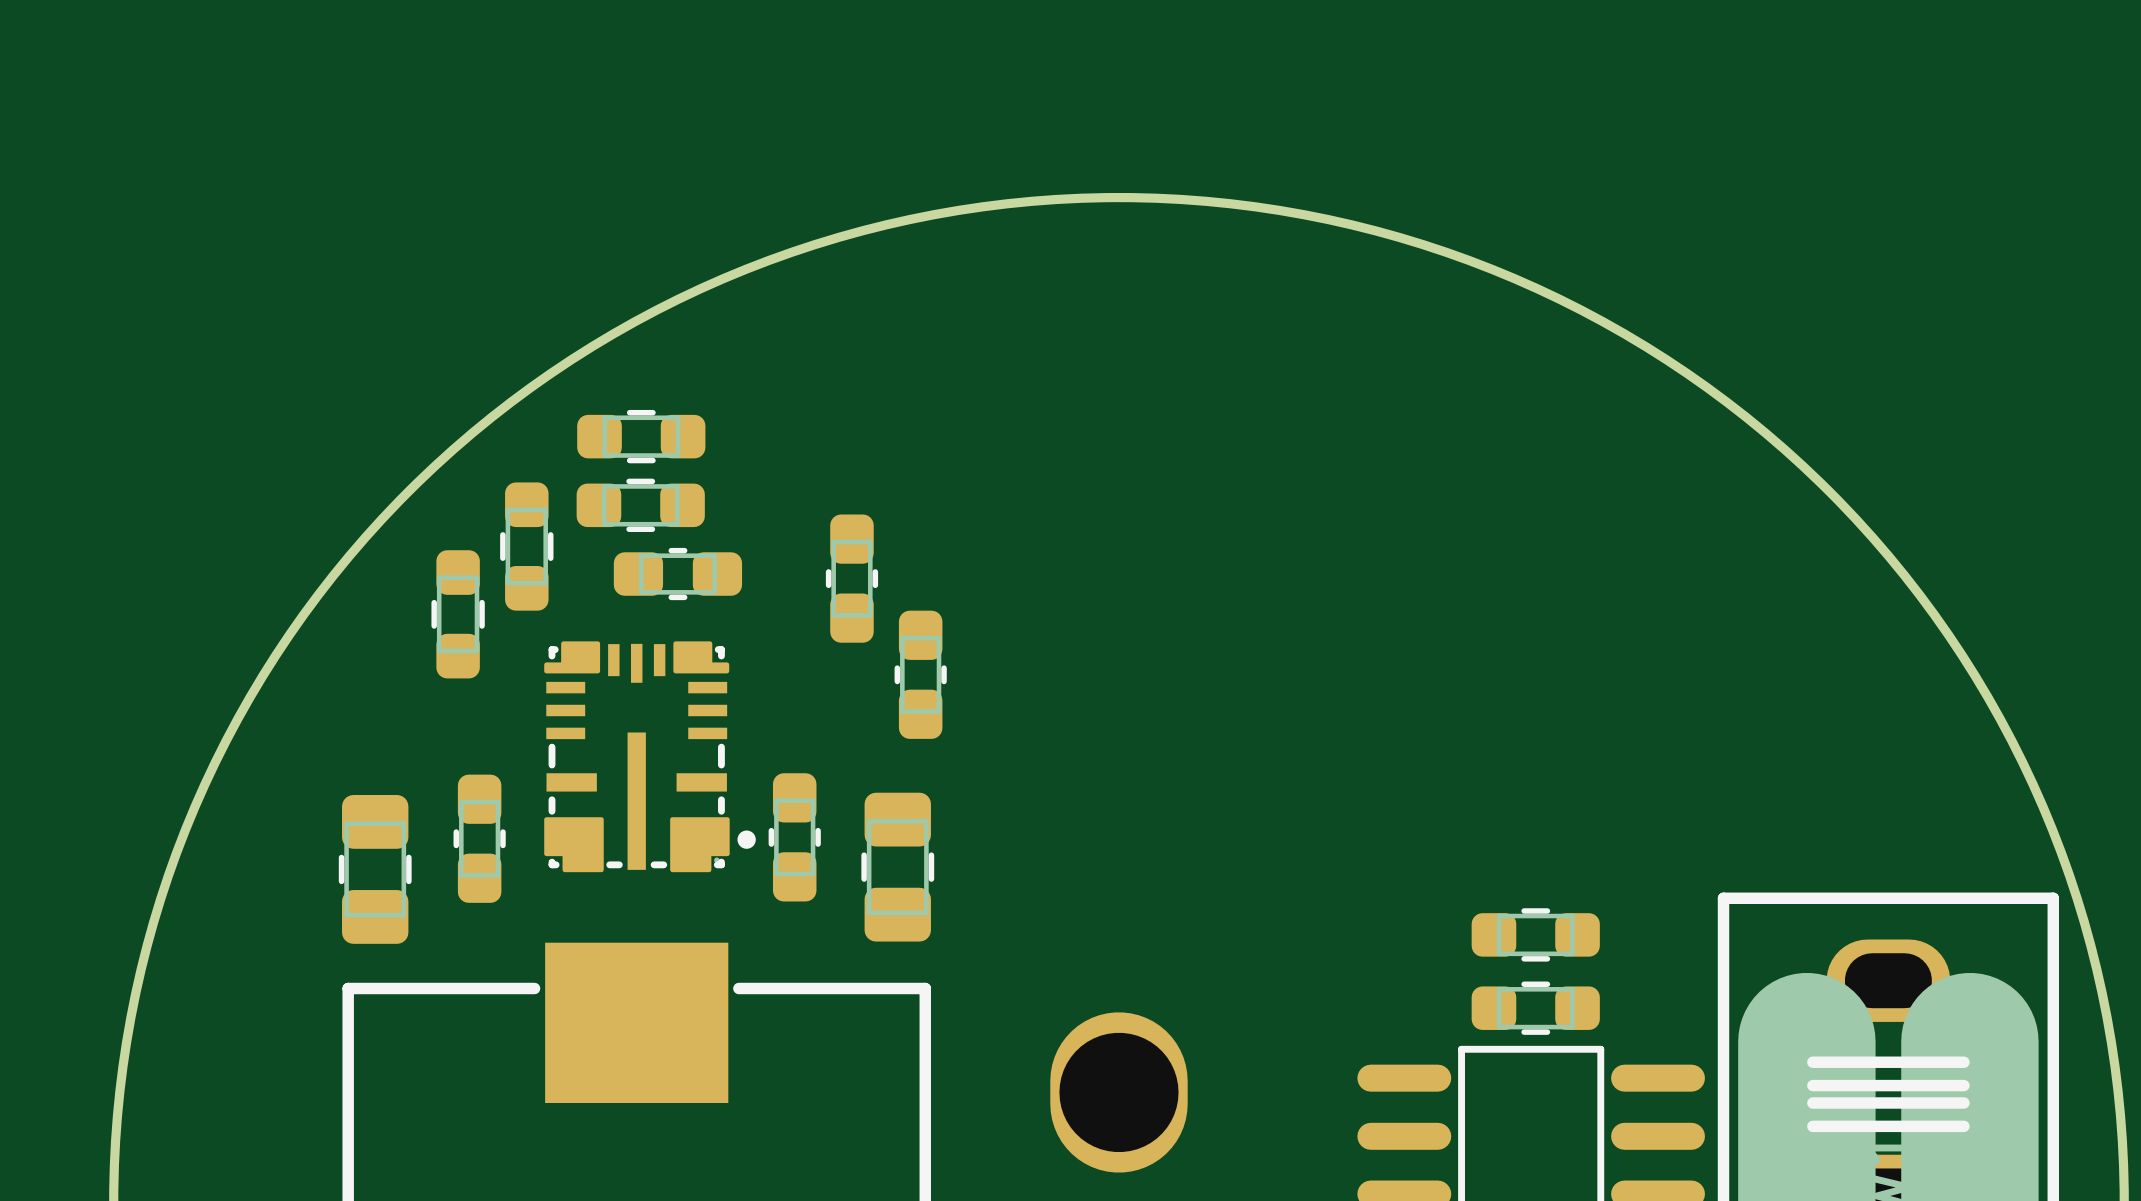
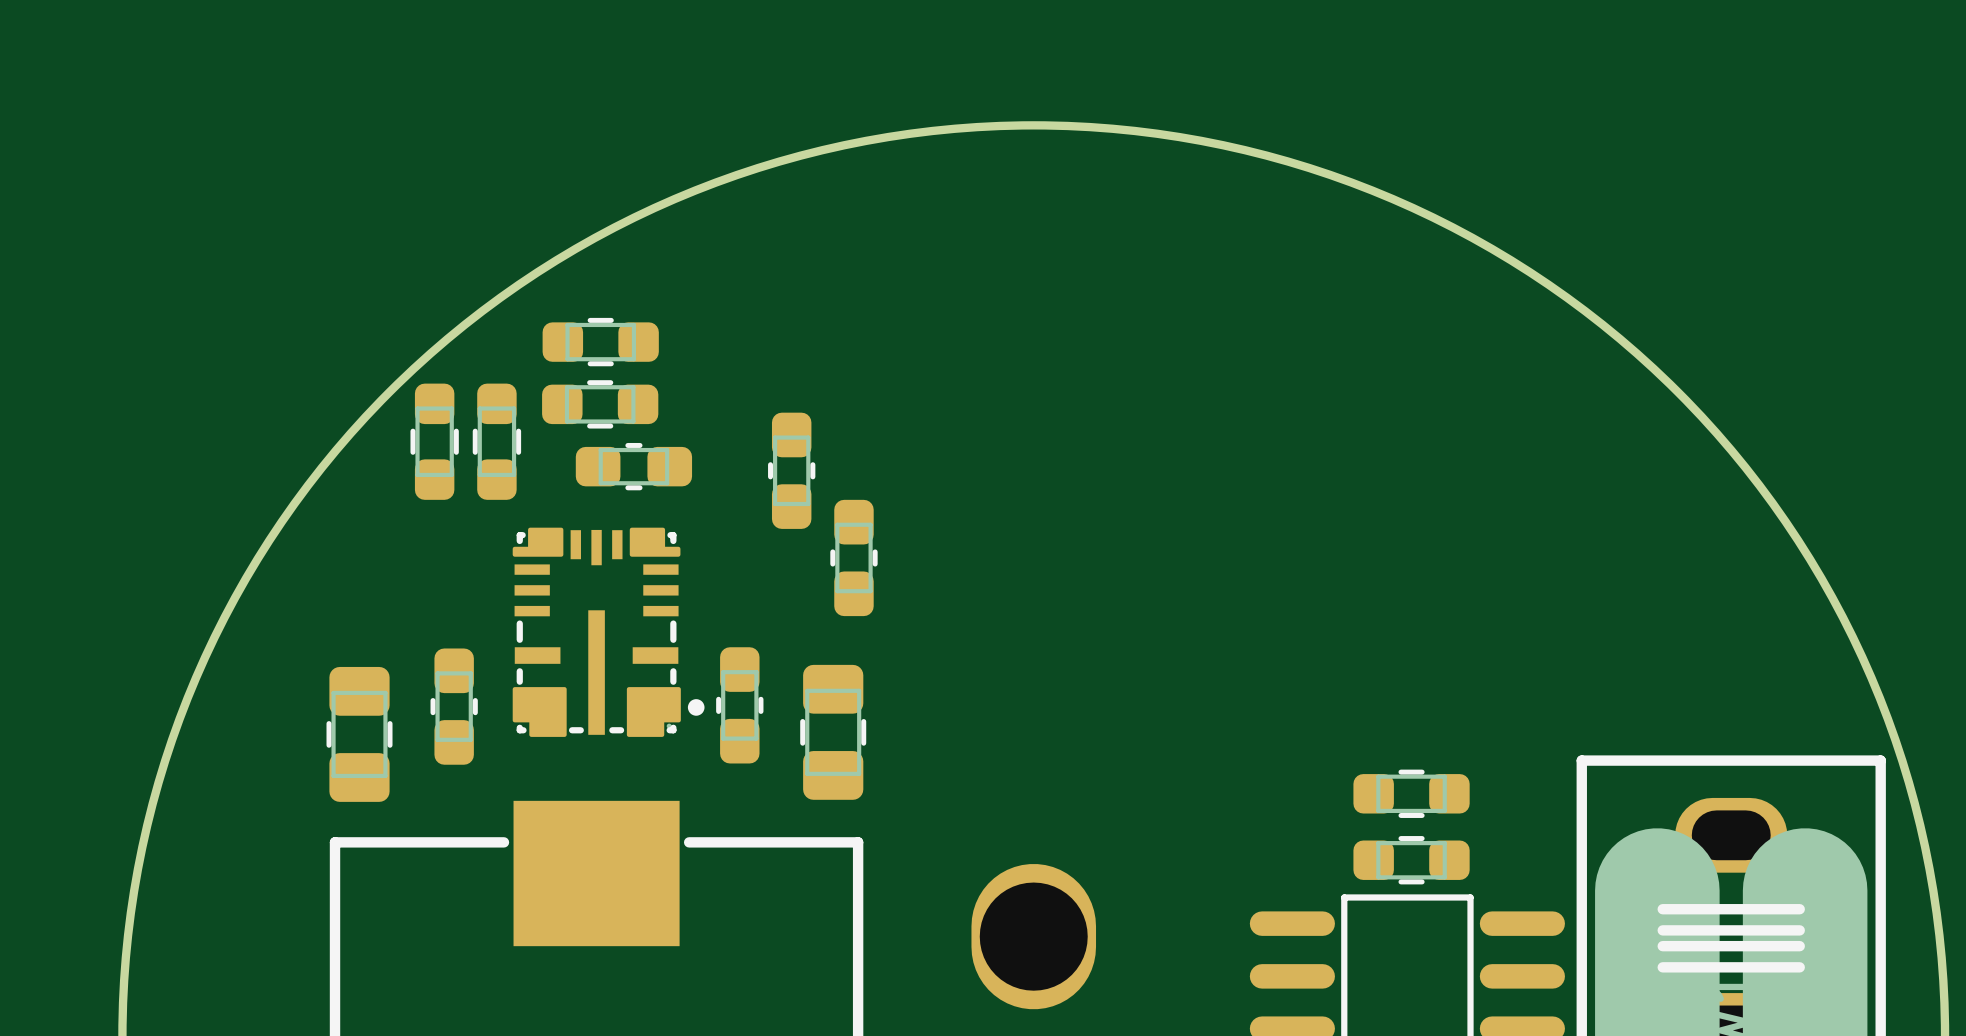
part position: (458, 614) -> (434, 441)

